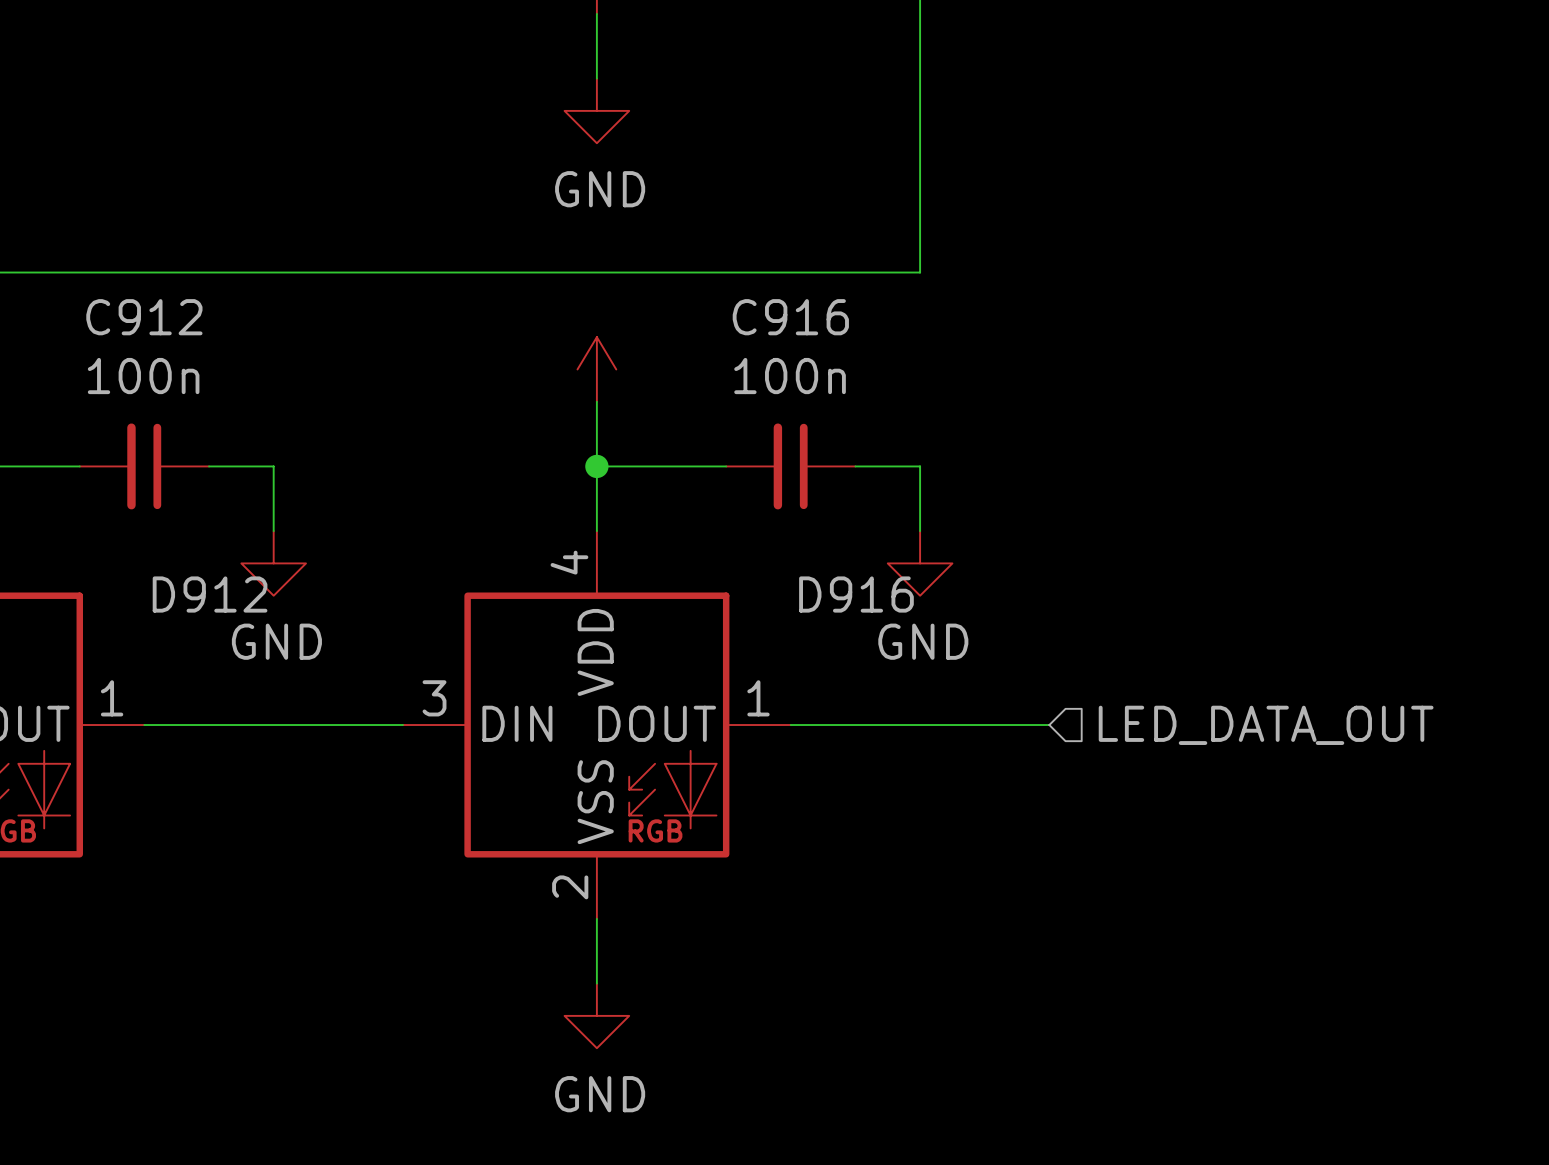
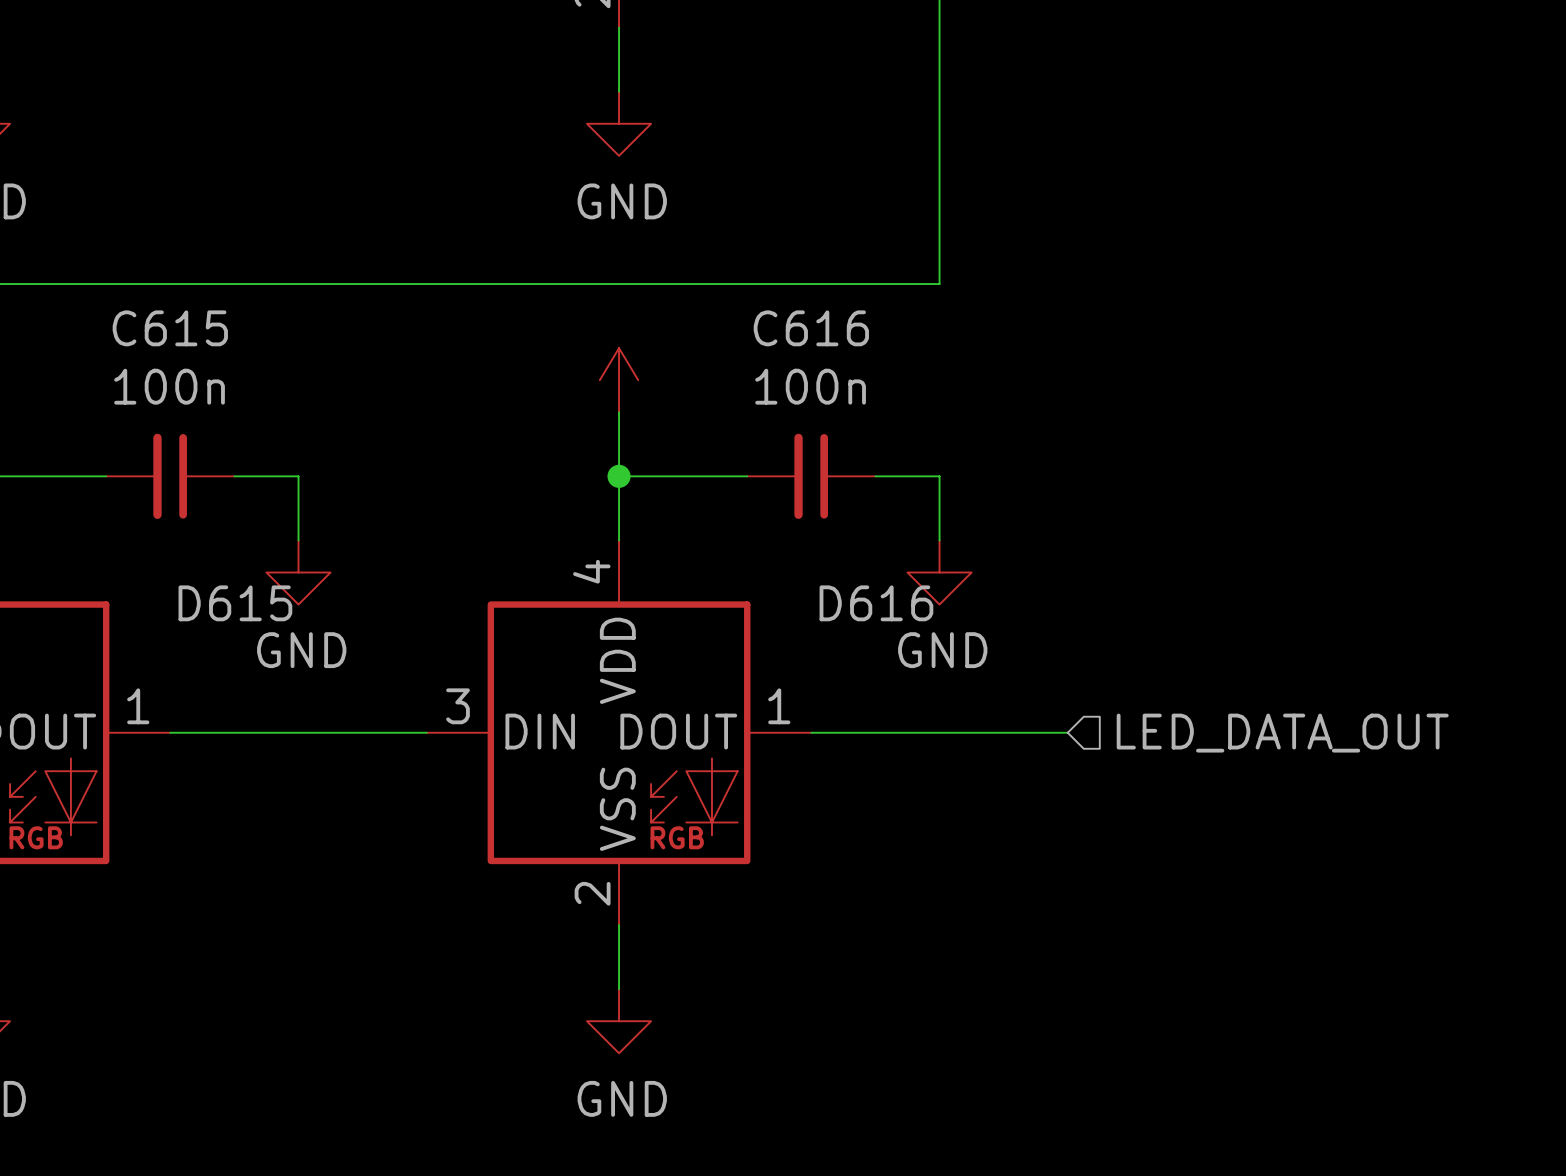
C912 name: C912 (144, 317) -> C615 (170, 328)
C916 name: C916 (790, 317) -> C616 (811, 328)
D912 name: D912 (210, 594) -> D615 (235, 603)
D916 name: D916 (856, 594) -> D616 (876, 603)

